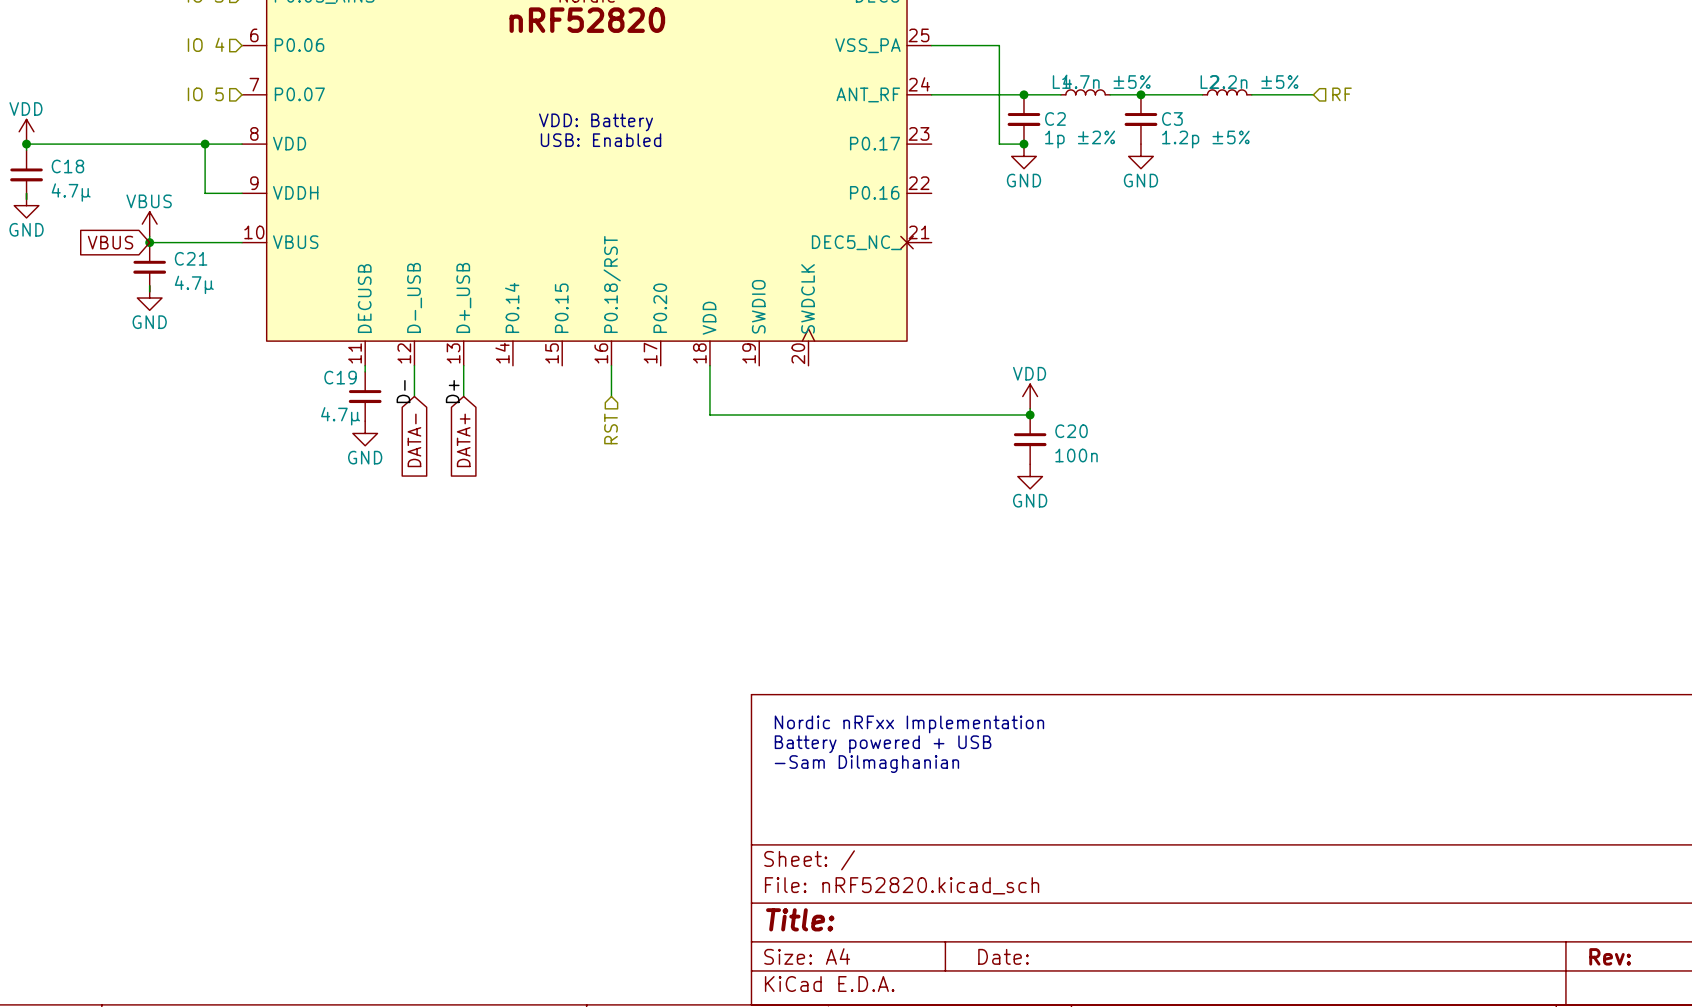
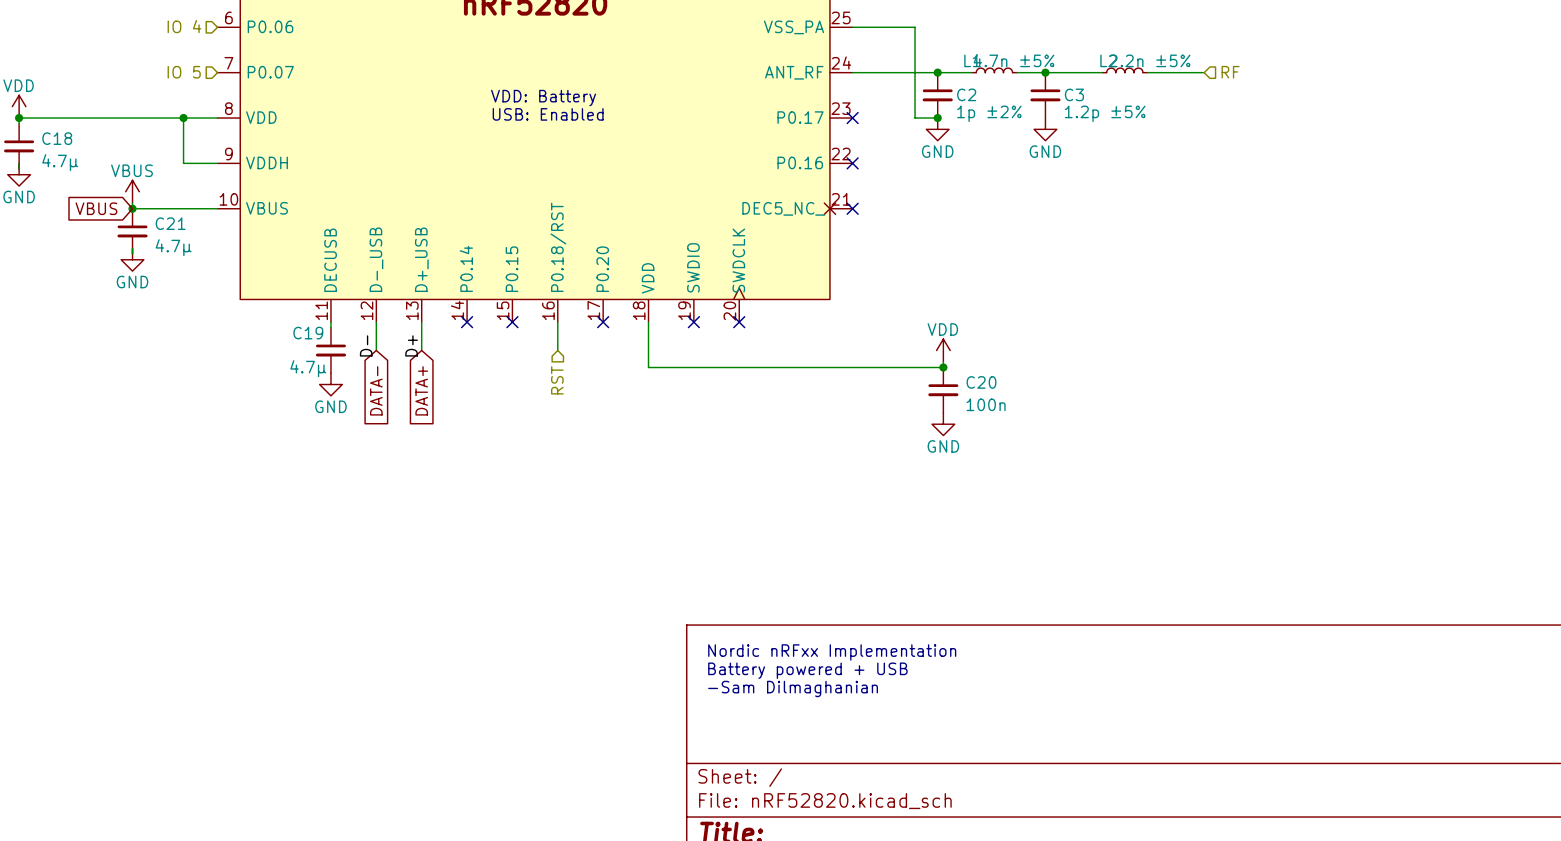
no-connect mark: none -> (852, 118)
no-connect mark: none -> (852, 163)
no-connect mark: none -> (852, 208)
no-connect mark: none -> (467, 322)
no-connect mark: none -> (512, 322)
no-connect mark: none -> (603, 322)
no-connect mark: none -> (693, 322)
no-connect mark: none -> (739, 322)

